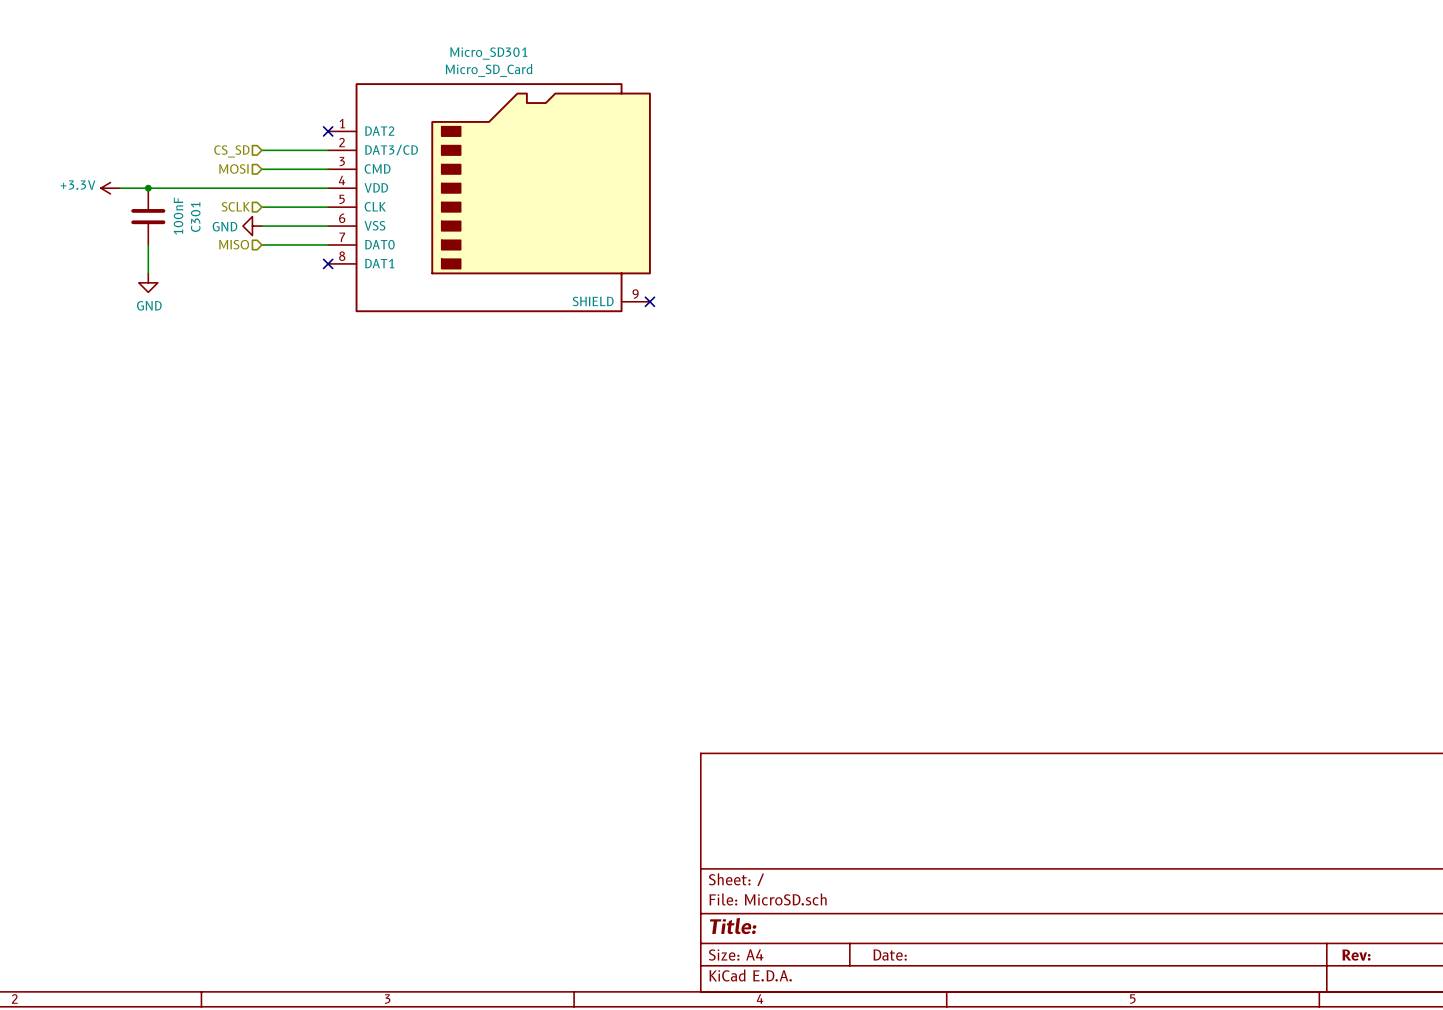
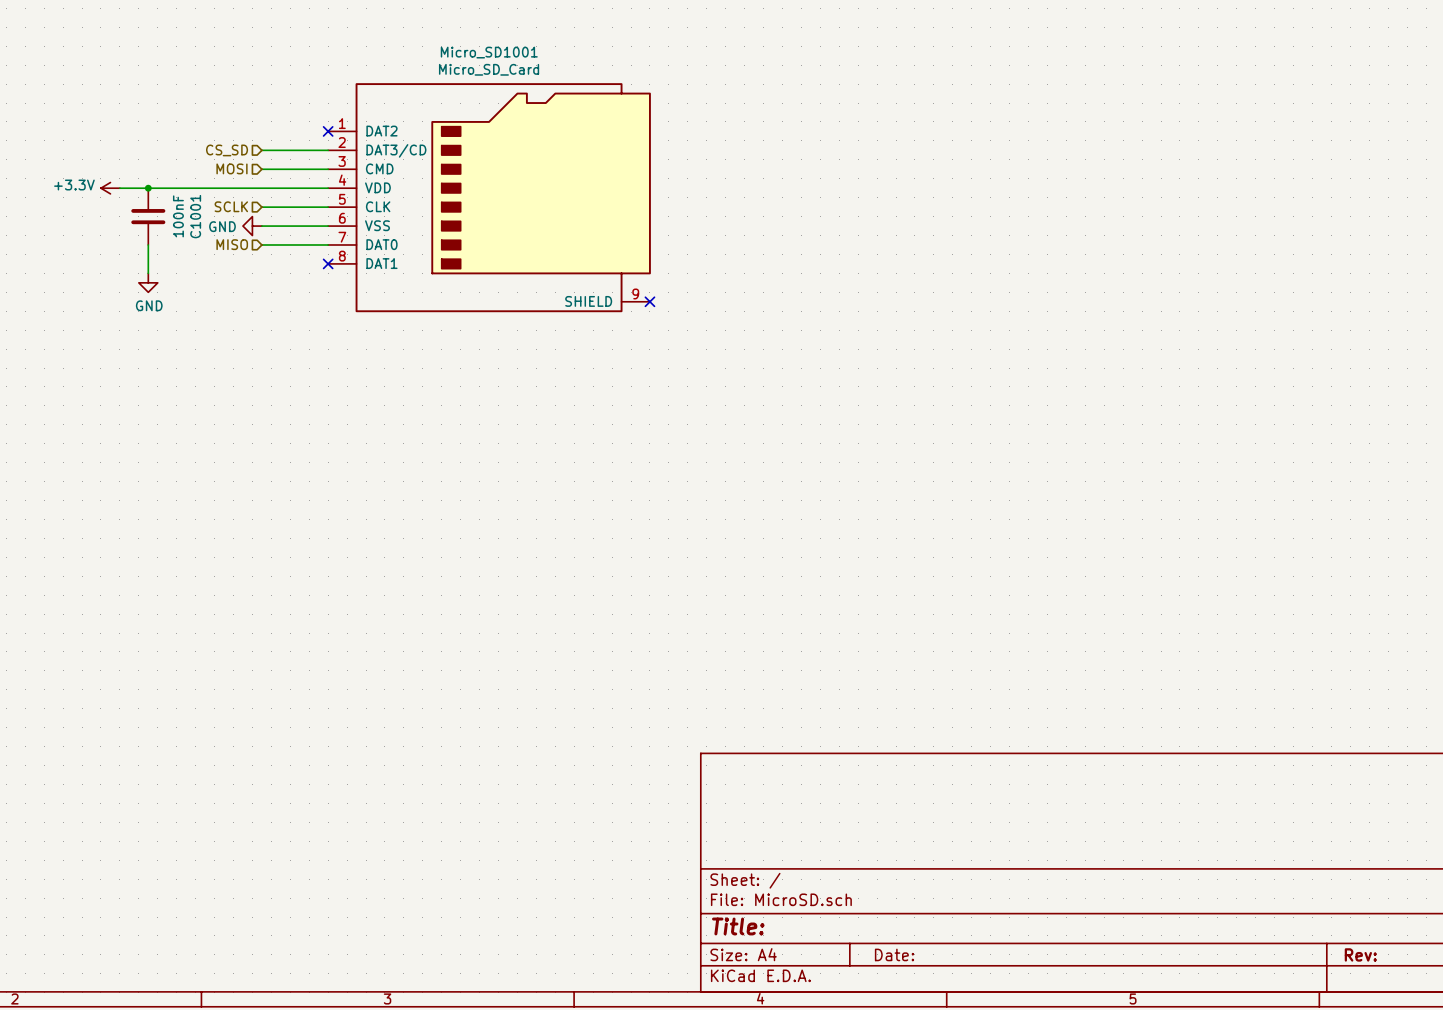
Micro_SD301 name: Micro_SD301 (488, 53) -> Micro_SD1001 (489, 52)
C301 name: C301 (195, 217) -> C1001 (195, 216)

